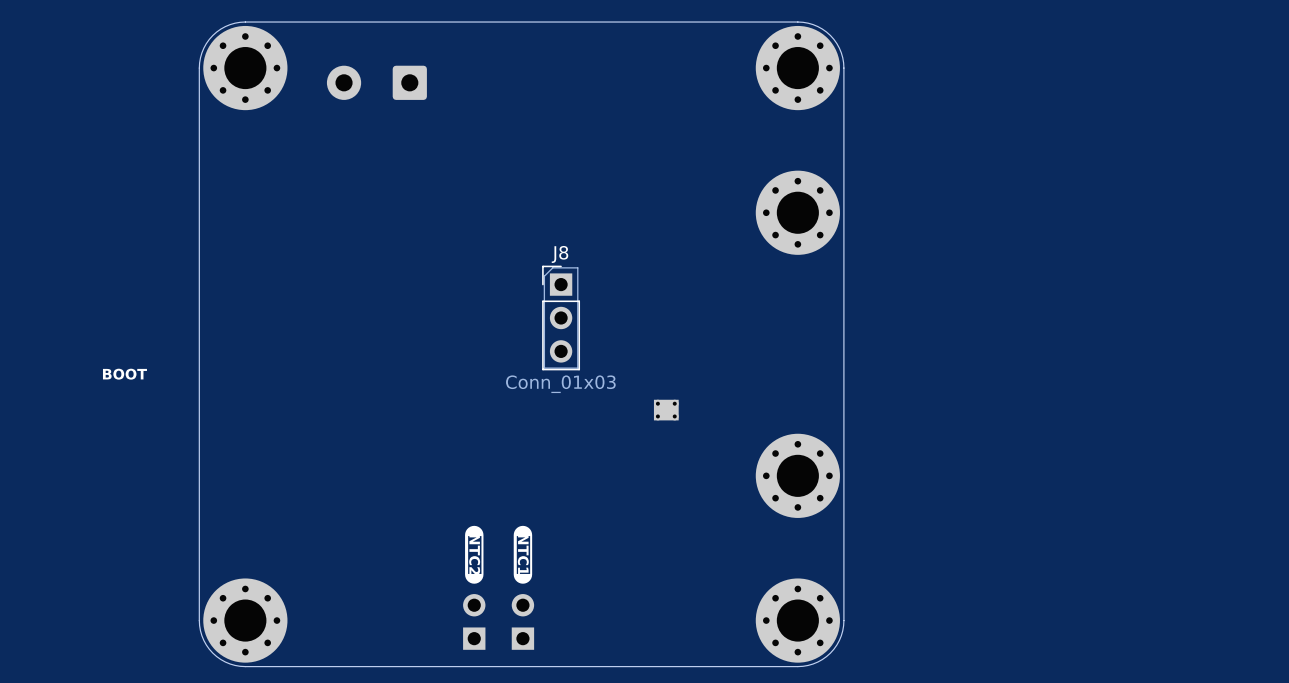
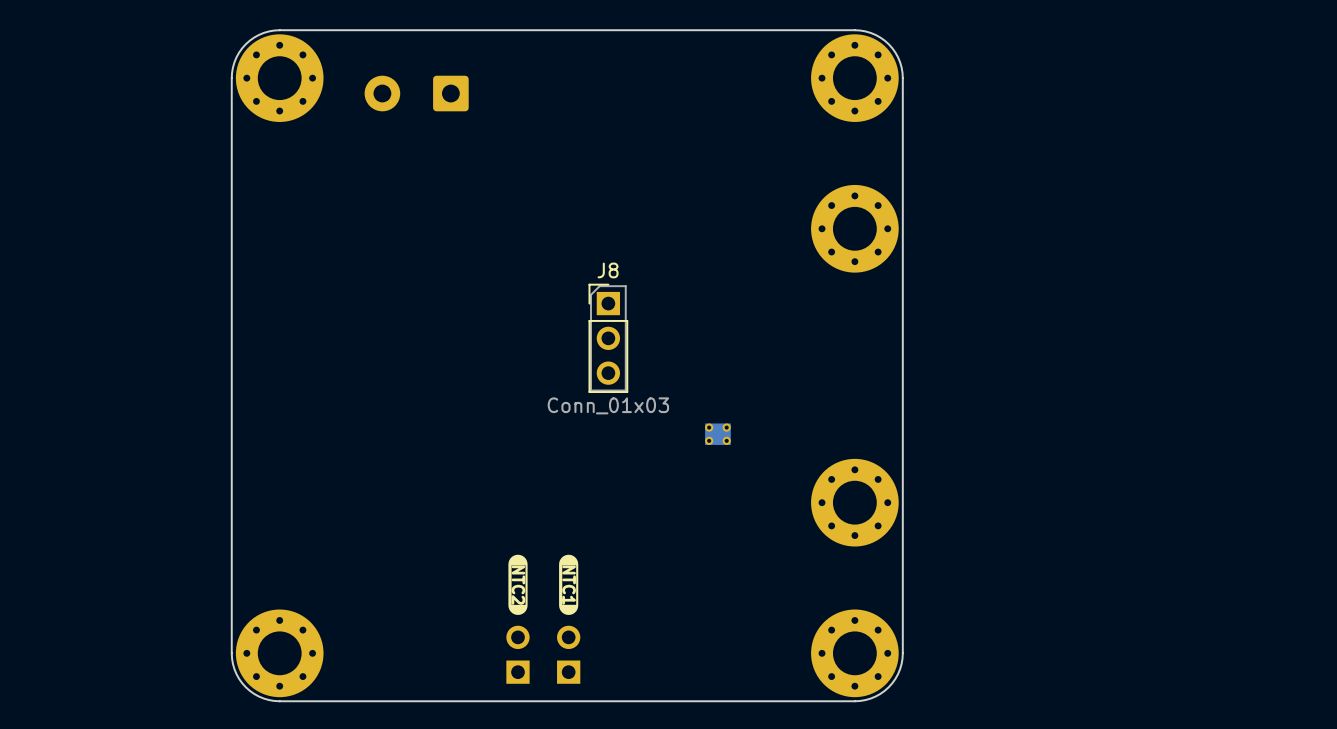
text: BOOT (124, 374) -> none

